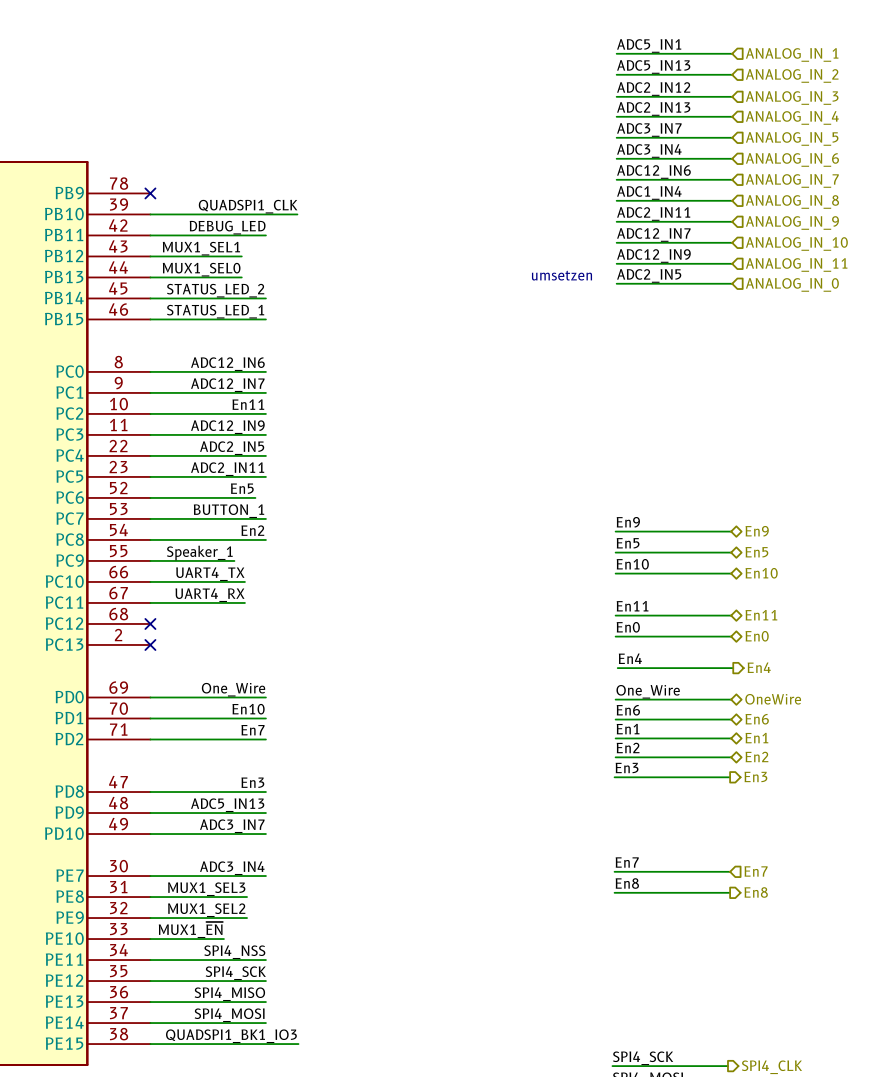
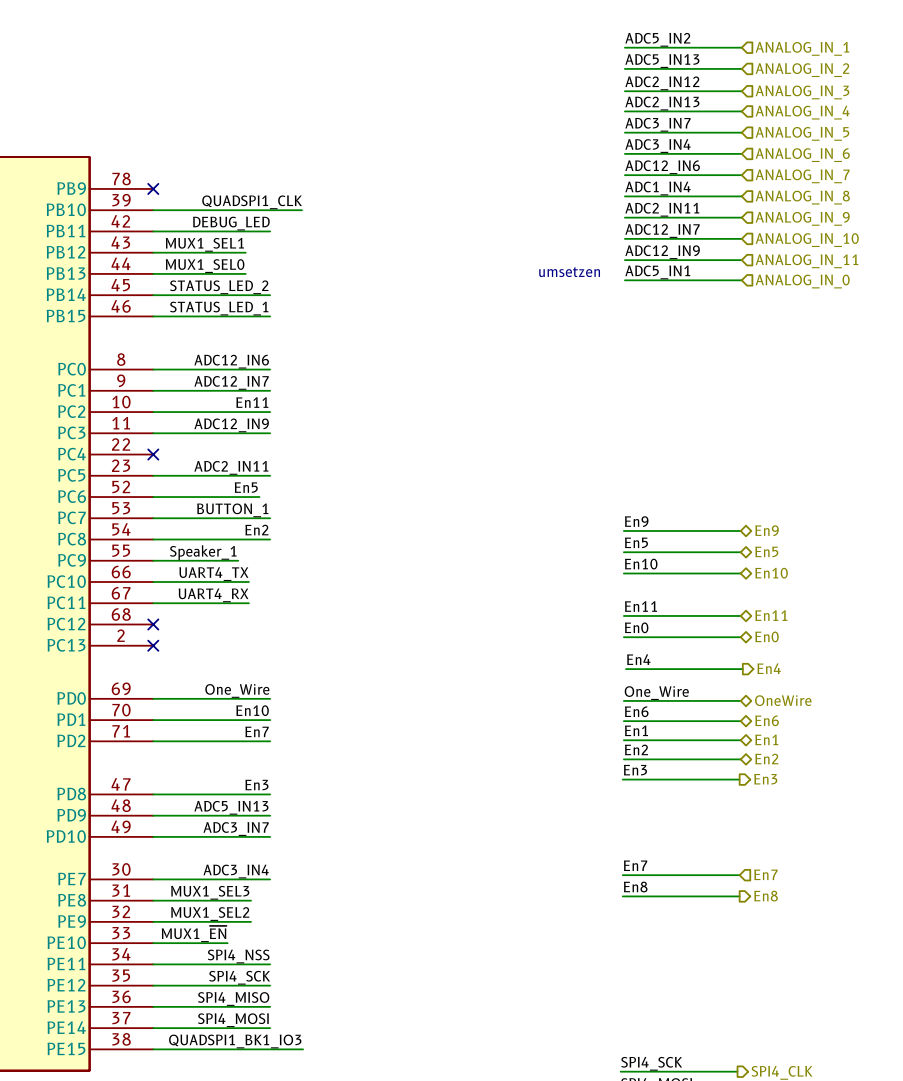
label: ADC5_IN1 (649, 45) -> ADC5_IN2 (657, 39)
label: ADC2_IN5 (649, 275) -> ADC5_IN1 (657, 272)
label: ADC2_IN5 (232, 448) -> none
wire: (150, 455) (265, 455) -> none
no-connect mark: none -> (153, 454)

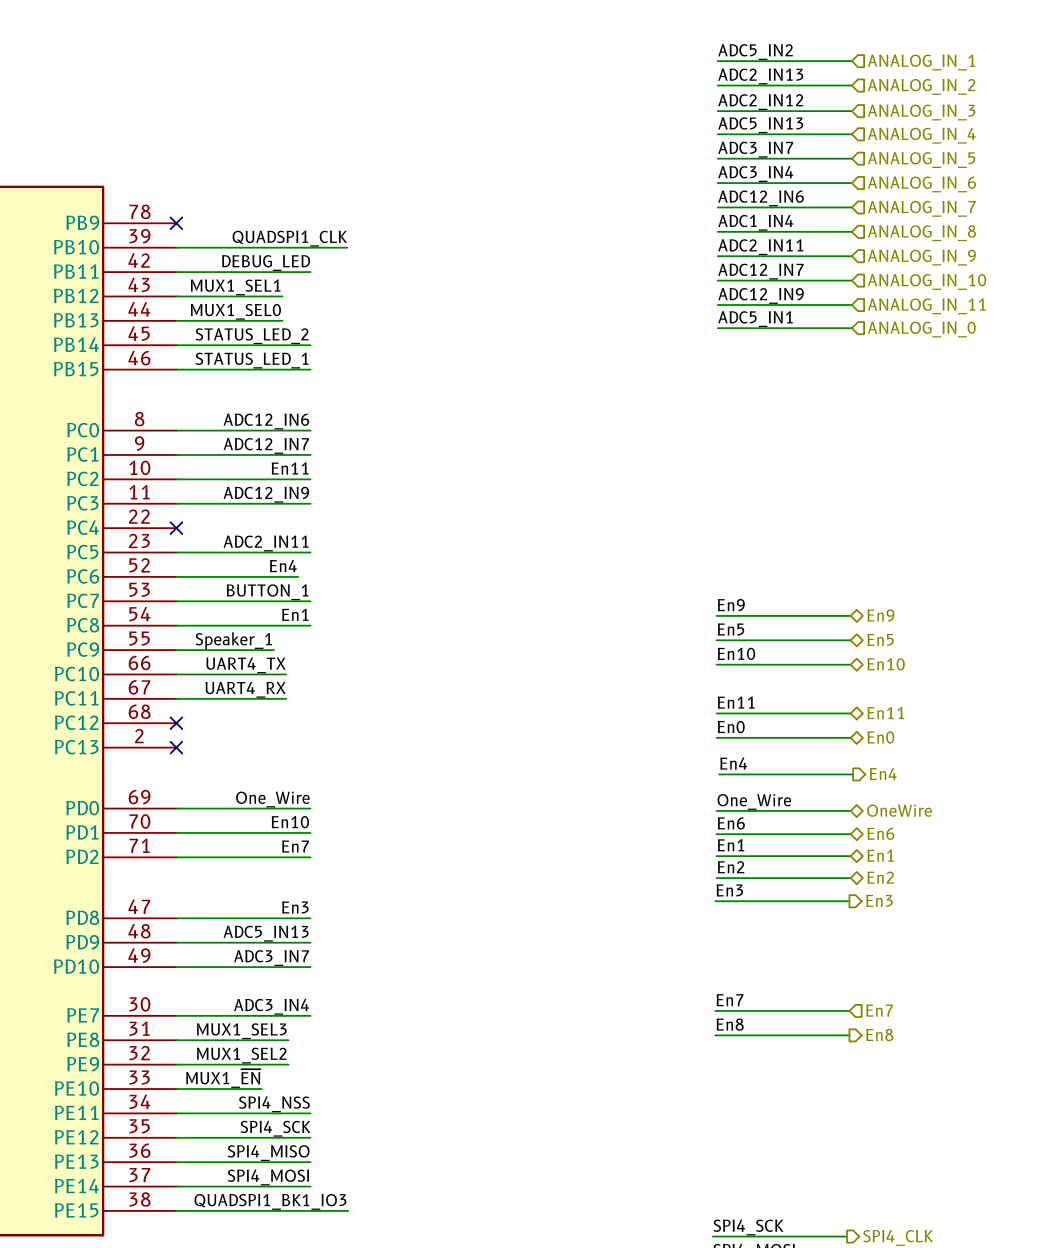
label: ADC5_IN13 (662, 61) -> ADC2_IN13 (760, 76)
label: ADC2_IN13 (662, 103) -> ADC5_IN13 (760, 125)
text: umsetzen (569, 272) -> none
label: En5 (246, 487) -> En4 (283, 566)
label: En2 (256, 530) -> En1 (295, 614)

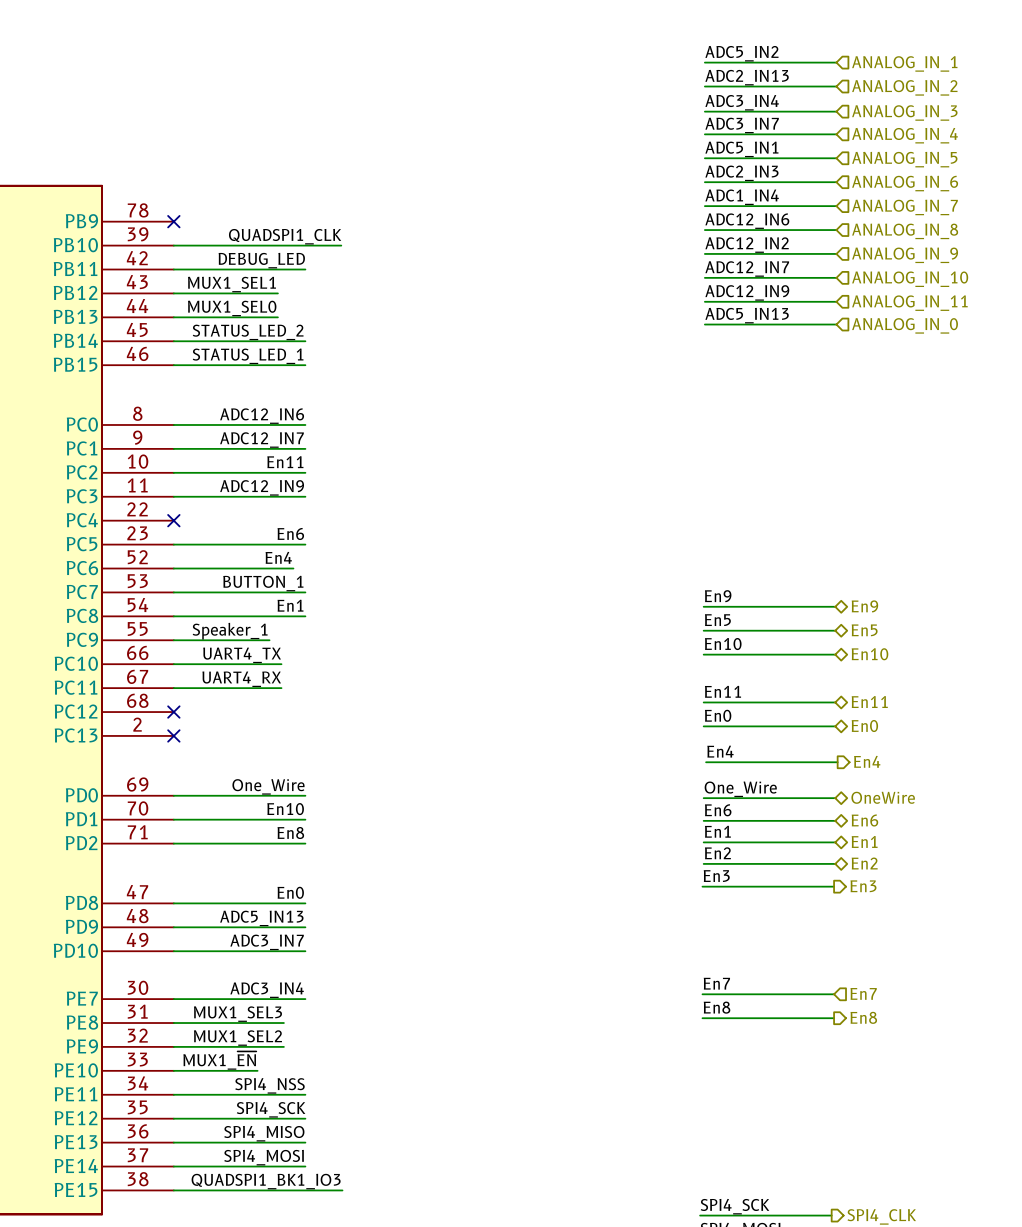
label: ADC2_IN12 (760, 102) -> ADC3_IN4 (742, 102)
label: ADC5_IN13 (760, 125) -> ADC3_IN7 (742, 125)
label: ADC3_IN7 (755, 149) -> ADC5_IN1 (741, 149)
label: ADC3_IN4 (755, 174) -> ADC2_IN3 (741, 173)
label: ADC12_IN6 (761, 198) -> ADC1_IN4 (742, 197)
label: ADC1_IN4 (755, 222) -> ADC12_IN6 (747, 221)
label: ADC2_IN11 (760, 247) -> ADC12_IN2 (747, 245)
label: ADC5_IN1 (755, 319) -> ADC5_IN13 (747, 315)
label: ADC2_IN11 (266, 543) -> En6 (290, 534)
label: En7 (295, 846) -> En8 (290, 833)
label: En3 (295, 907) -> En0 (290, 892)

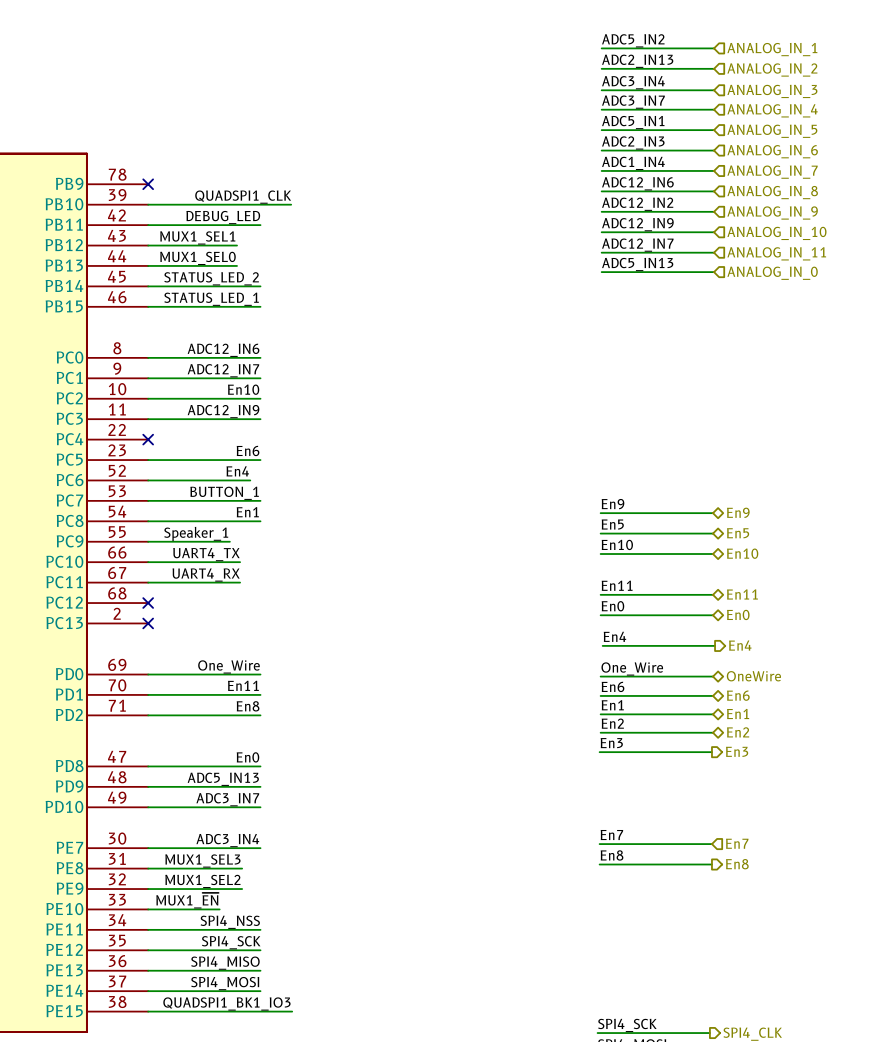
label: ADC12_IN7 (747, 269) -> ADC12_IN9 (637, 224)
label: ADC12_IN9 (747, 292) -> ADC12_IN7 (637, 245)
label: En11 (285, 462) -> En10 (243, 389)
label: En10 (285, 809) -> En11 (243, 685)

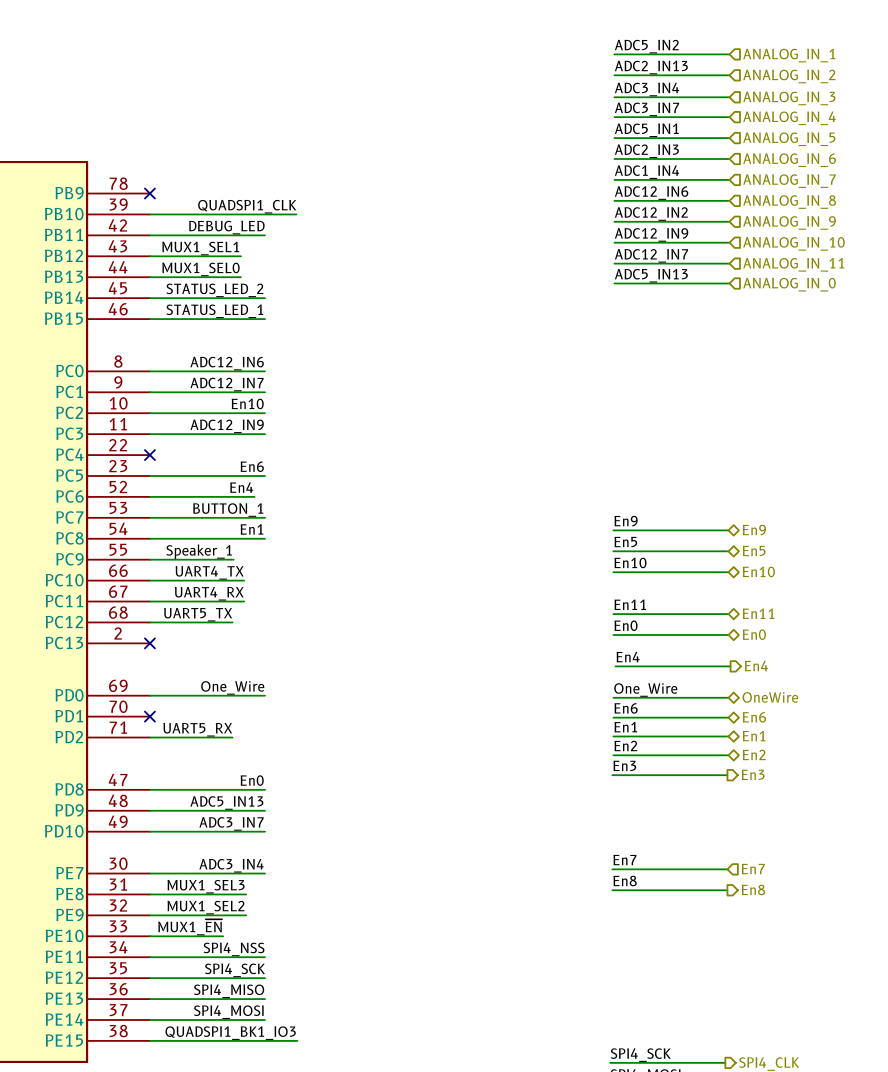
label: none -> UART5_TX (198, 614)
wire: none -> (149, 622) (232, 622)
no-connect mark: (148, 603) -> none
label: En11 (243, 685) -> none
wire: (148, 694) (260, 694) -> none
no-connect mark: none -> (149, 716)
label: En8 (248, 706) -> none
label: none -> UART5_RX (197, 729)
wire: (228, 715) (260, 715) -> none

